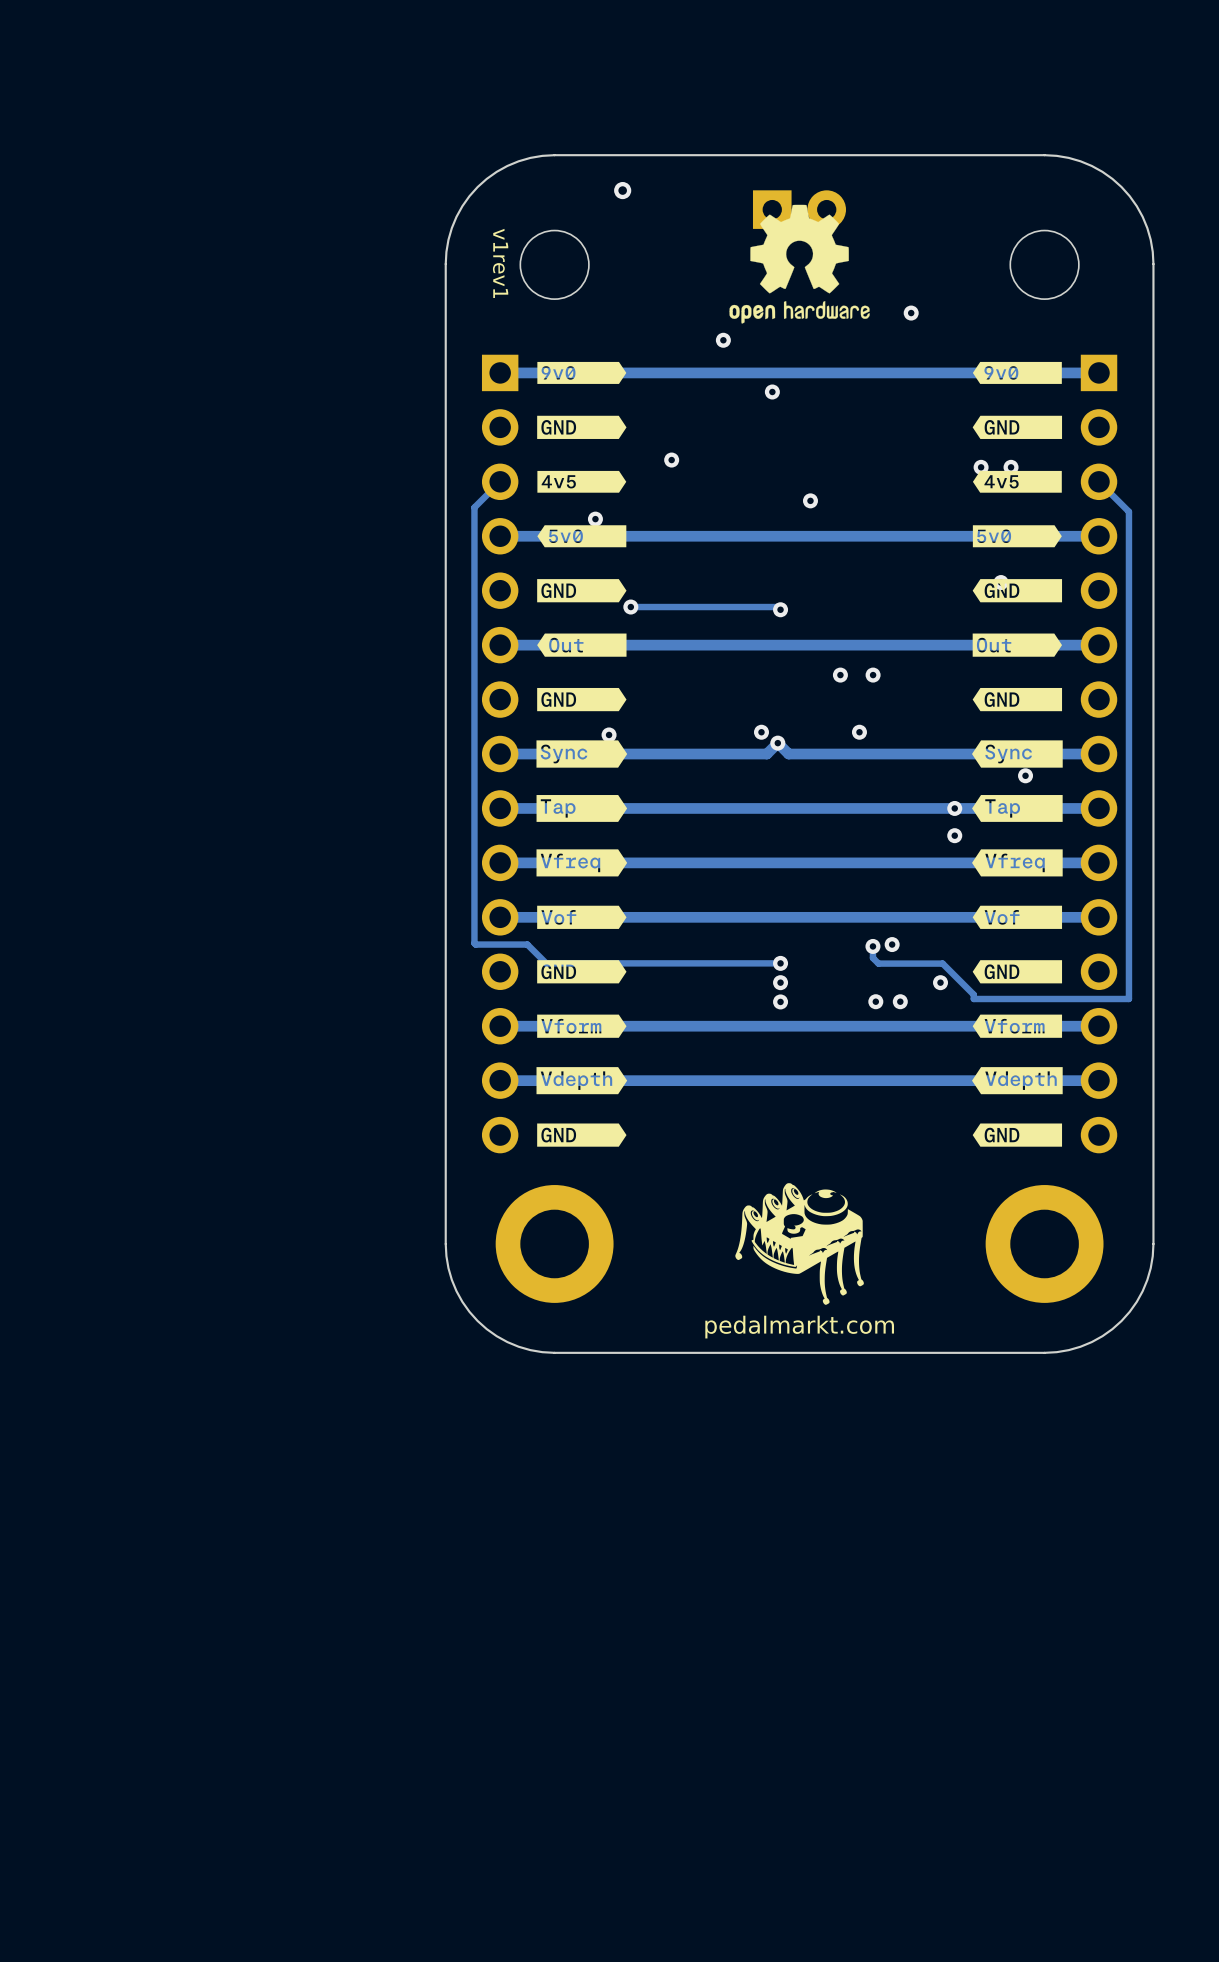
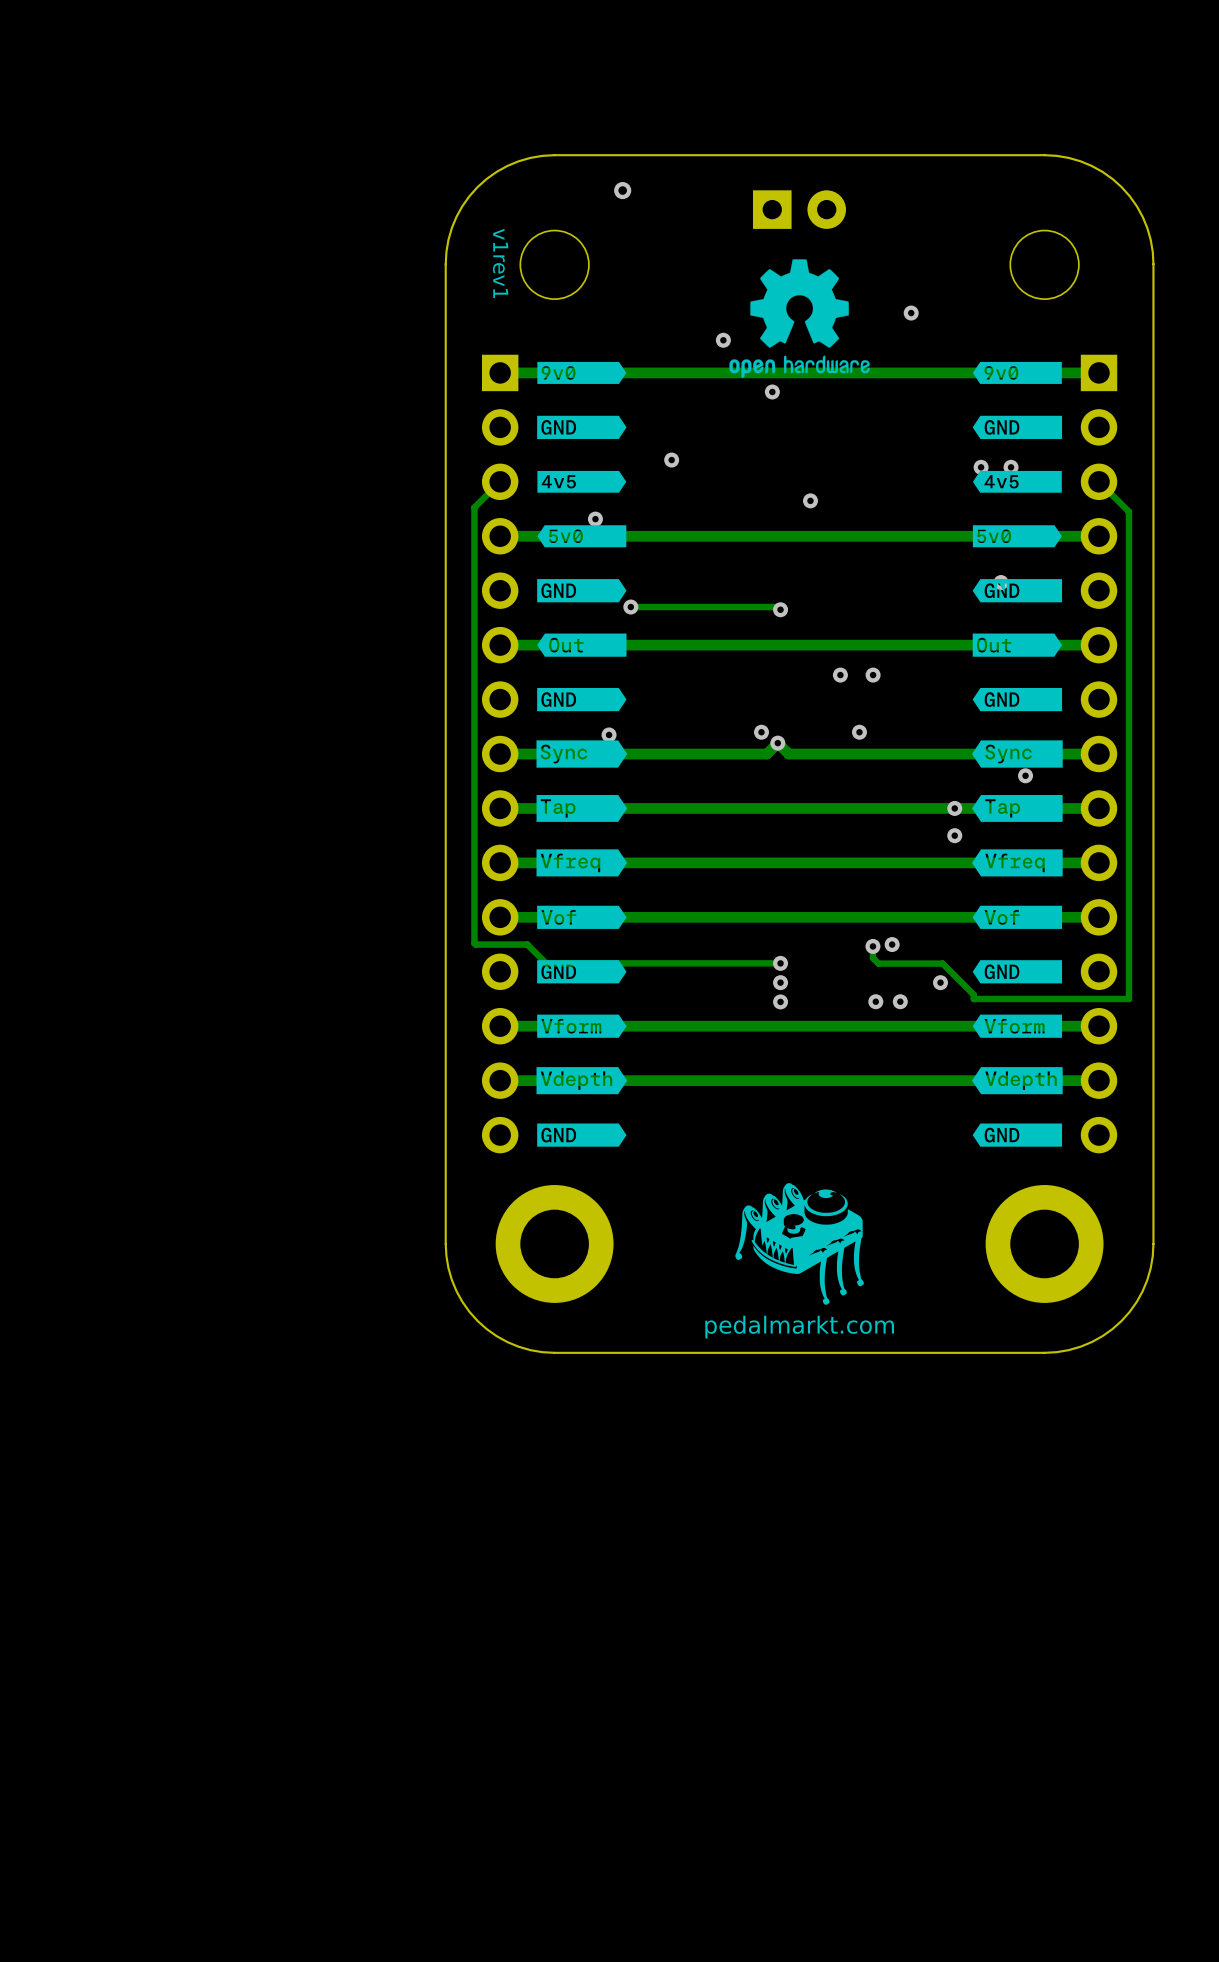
drawing position: (799, 264) -> (799, 318)

